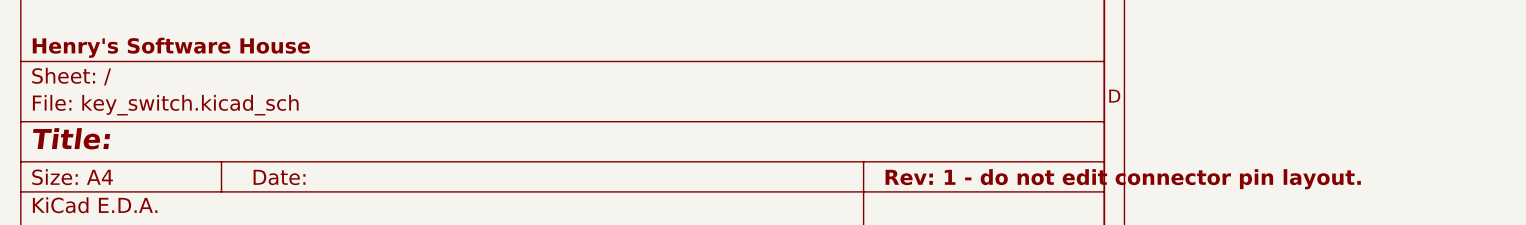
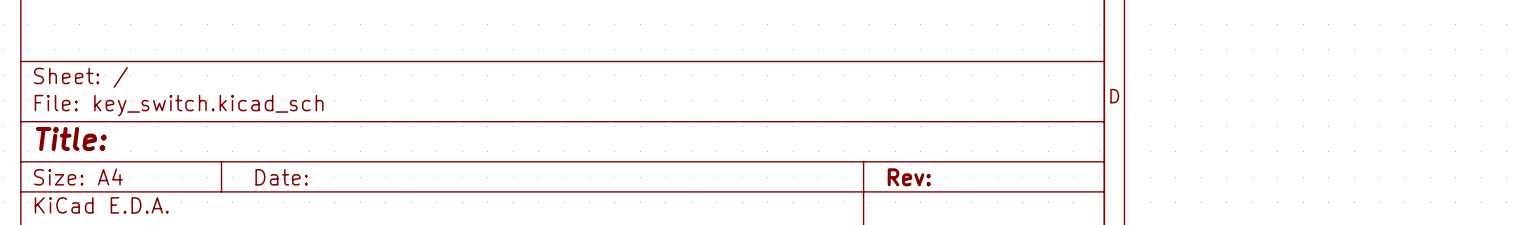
title block: Henry's Software House (171, 47) -> none
title block: Rev: 1 - do not edit connector pin layout. (1123, 179) -> Rev: (909, 177)

